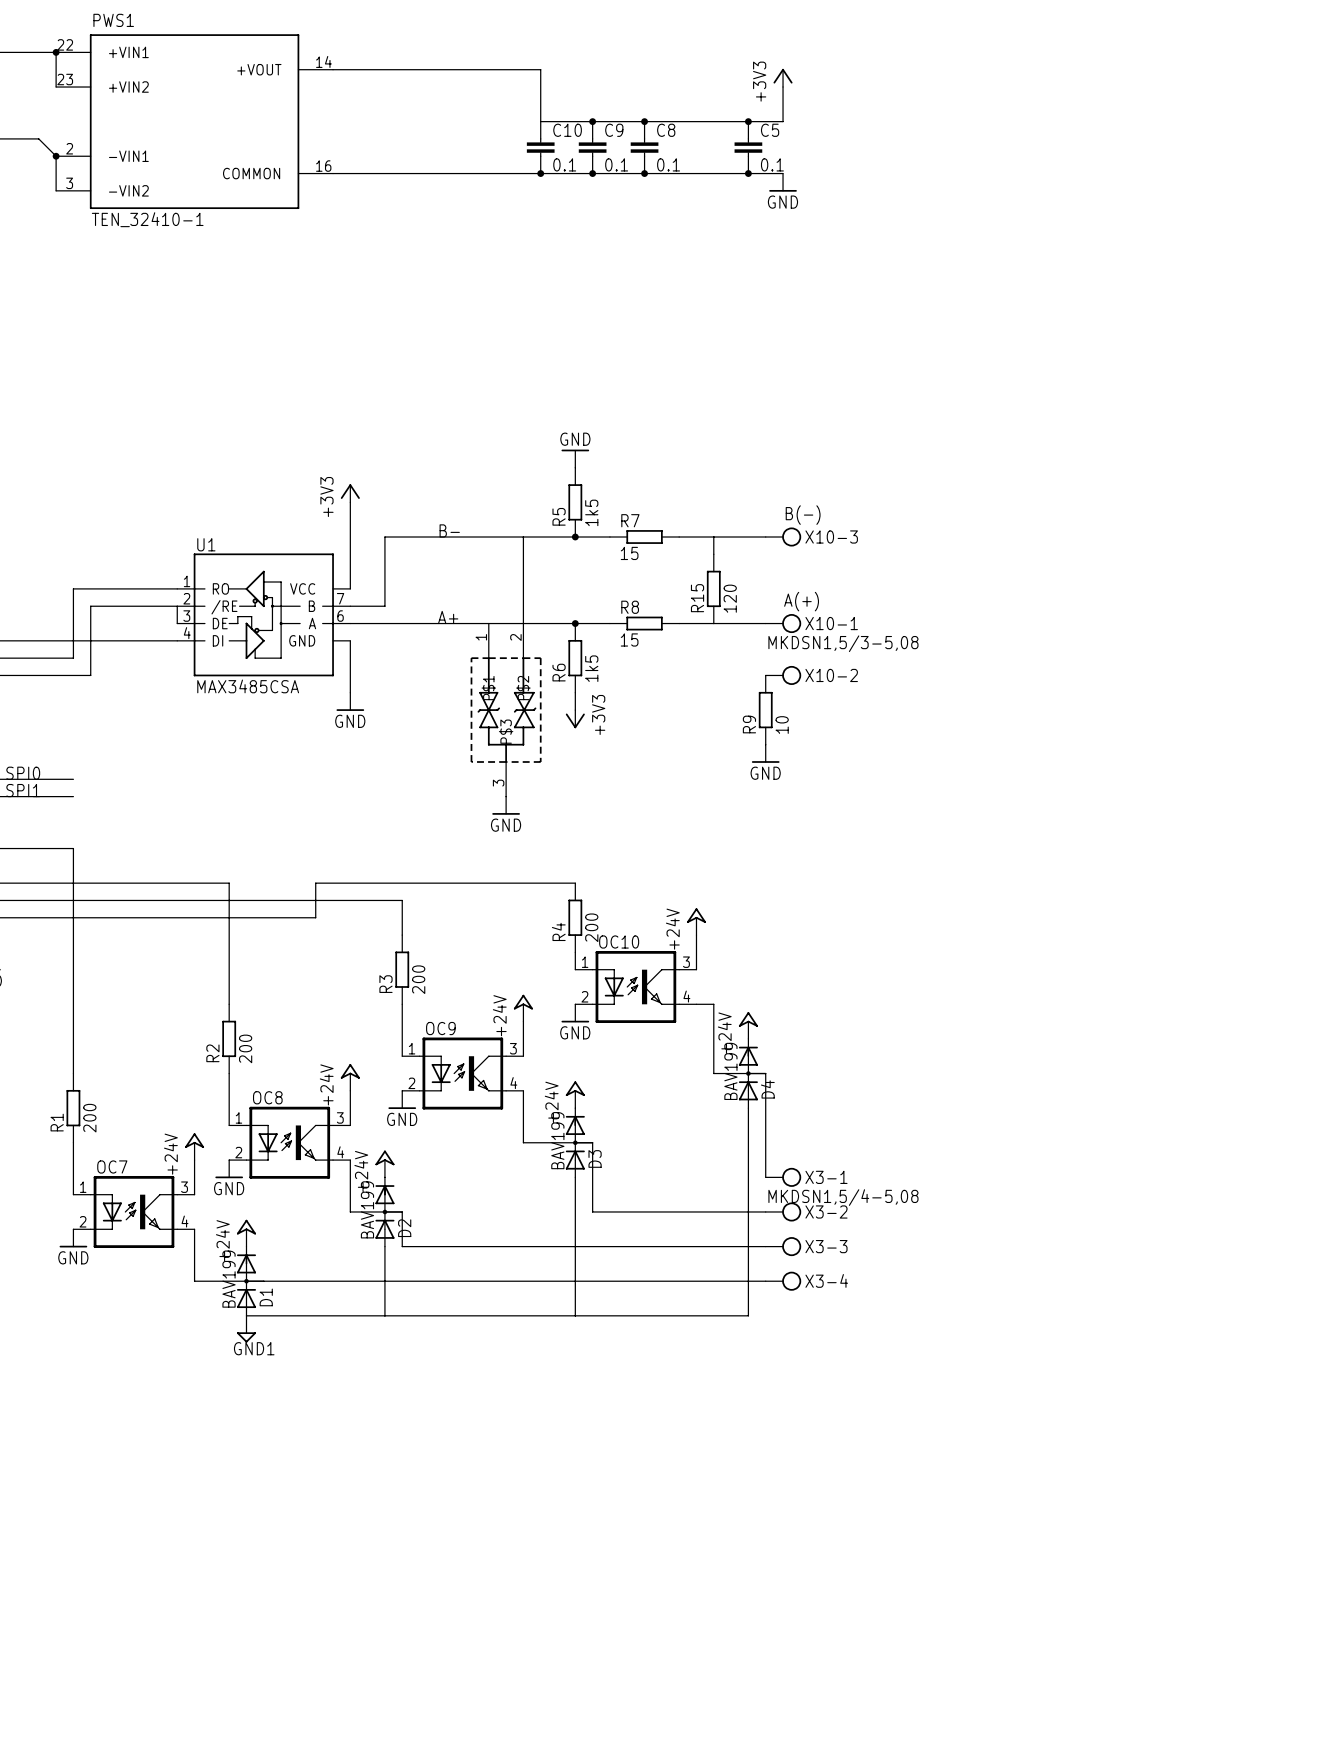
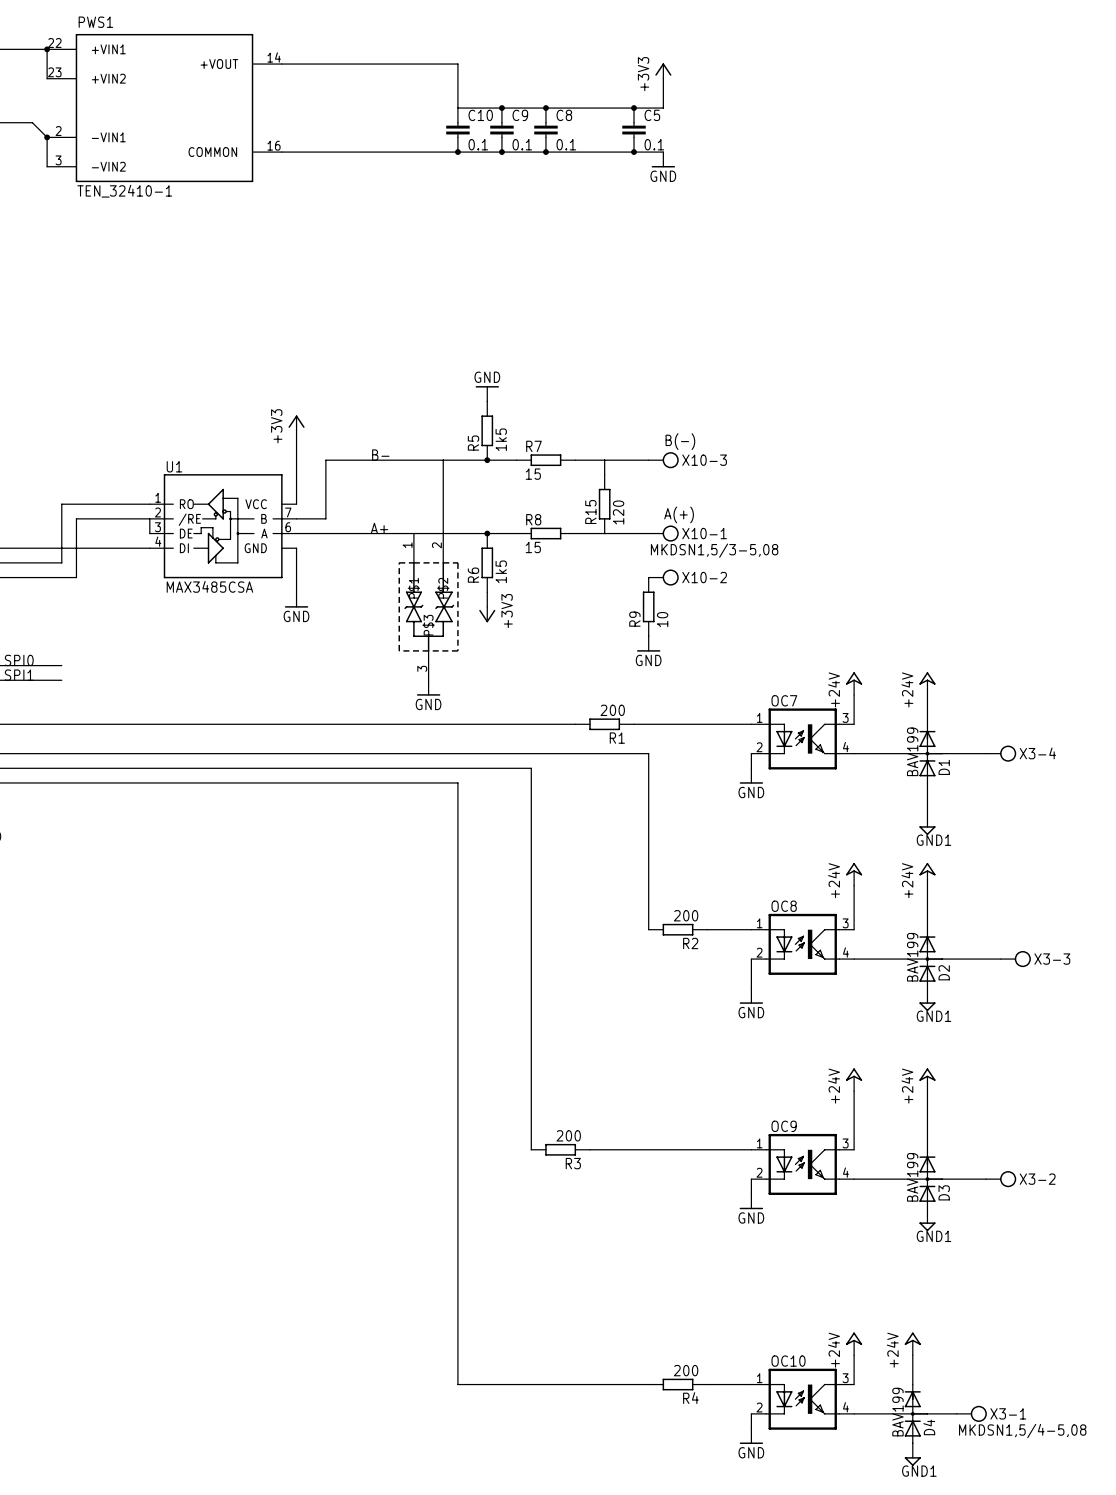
power symbol: none -> +24V (854, 683)
power symbol: none -> +24V (927, 683)
wire: none -> (854, 694) (854, 724)
wire: none -> (927, 694) (927, 724)
wire: (73, 848) (73, 1073) -> (61, 724) (575, 724)
wire: none -> (634, 724) (751, 724)
wire: (229, 883) (229, 1004) -> none
wire: (315, 883) (315, 917) -> (267, 753) (193, 753)
wire: none -> (751, 753) (751, 768)
wire: none -> (854, 753) (986, 753)
wire: (402, 900) (402, 935) -> (340, 768) (531, 768) (531, 1149)
power symbol: none -> GND (751, 776)
wire: none -> (267, 782) (457, 782) (457, 1384) (648, 1384)
R4 rotation: 0° (575, 917) -> 90° clockwise (678, 1384)
R4 position: (575, 917) -> (678, 1384)
wire: none -> (927, 782) (927, 812)
power symbol: +24V (696, 921) -> none
R4 value position: 200 (591, 927) -> 200 (686, 1370)
R4 name position: R4 (558, 931) -> R4 (690, 1398)
wire: (696, 935) (696, 969) -> none
wire: (575, 952) (575, 969) -> none
power symbol: none -> GND1 (927, 823)
R3 rotation: 0° (402, 969) -> 90° clockwise (560, 1149)
R3 position: (402, 969) -> (560, 1149)
R3 value position: 200 (418, 979) -> 200 (568, 1135)
R3 name position: R3 (385, 984) -> R3 (573, 1163)
OC10 position: (635, 986) -> (802, 1399)
wire: (402, 1004) (402, 1056) -> none
wire: (696, 1004) (713, 1004) (713, 1073) (765, 1073) -> (487, 753) (648, 753) (648, 915)
power symbol: +24V (523, 1008) -> none
power symbol: GND (575, 1013) -> none
wire: (523, 1021) (523, 1056) -> none
power symbol: +24V (748, 1025) -> none
power symbol: none -> +24V (854, 874)
power symbol: none -> +24V (927, 874)
R2 rotation: 0° (229, 1038) -> 90° clockwise (678, 929)
R2 position: (229, 1038) -> (678, 929)
wire: none -> (854, 885) (854, 929)
wire: none -> (927, 885) (927, 929)
R2 value position: 200 (245, 1048) -> 200 (686, 915)
R2 name position: R2 (212, 1053) -> R2 (690, 943)
wire: (229, 1073) (229, 1125) -> none
OC9 position: (462, 1073) -> (802, 1164)
D4 position: (752, 1073) -> (916, 1413)
power symbol: +24V (350, 1077) -> none
wire: (350, 1090) (350, 1125) -> none
wire: (523, 1090) (523, 1142) (592, 1142) (592, 1211) (765, 1211) -> none
wire: (765, 1090) (765, 1177) -> none
wire: none -> (707, 929) (751, 929)
power symbol: +24V (575, 1094) -> none
power symbol: GND (402, 1099) -> none
R1 rotation: 0° (73, 1108) -> 90° clockwise (604, 724)
R1 position: (73, 1108) -> (604, 724)
wire: (748, 1108) (748, 1315) (246, 1315) -> none
R1 value position: 200 (89, 1118) -> 200 (612, 710)
R1 name position: R1 (57, 1122) -> R1 (617, 738)
wire: none -> (751, 959) (751, 988)
wire: none -> (854, 959) (1000, 959)
wire: (73, 1142) (73, 1194) -> none
OC8 position: (289, 1142) -> (802, 944)
D3 position: (579, 1142) -> (930, 1179)
power symbol: +24V (194, 1146) -> none
wire: (194, 1160) (194, 1194) -> none
wire: (350, 1160) (350, 1211) (402, 1211) (402, 1246) (765, 1246) -> none
power symbol: +24V (384, 1163) -> none
power symbol: GND (229, 1169) -> none
power symbol: none -> GND (751, 996)
power symbol: none -> GND1 (927, 999)
wire: (575, 1177) (575, 1315) -> none
X3-1 position: (783, 1177) -> (971, 1413)
OC7 position: (133, 1211) -> (802, 738)
D2 position: (388, 1211) -> (930, 959)
X3-2 position: (783, 1211) -> (1001, 1179)
wire: (194, 1229) (194, 1281) (765, 1281) -> none
power symbol: +24V (246, 1233) -> none
power symbol: GND (73, 1238) -> none
wire: (384, 1246) (384, 1315) -> none
X3-3 position: (783, 1246) -> (1015, 959)
power symbol: none -> +24V (854, 1079)
power symbol: none -> +24V (927, 1079)
D1 position: (250, 1281) -> (930, 753)
X3-4 position: (783, 1281) -> (1001, 753)
wire: none -> (854, 1091) (854, 1149)
wire: none -> (927, 1091) (927, 1149)
power symbol: GND1 (246, 1329) -> none
wire: none -> (589, 1149) (751, 1149)
wire: none -> (751, 1179) (751, 1193)
wire: none -> (854, 1179) (986, 1179)
power symbol: none -> GND (751, 1201)
power symbol: none -> GND1 (927, 1219)
power symbol: none -> +24V (854, 1343)
power symbol: none -> +24V (912, 1343)
wire: none -> (854, 1355) (854, 1384)
wire: none -> (912, 1355) (912, 1384)
wire: none -> (707, 1384) (751, 1384)
wire: none -> (751, 1413) (751, 1428)
wire: none -> (854, 1413) (956, 1413)
power symbol: none -> GND (751, 1436)
power symbol: none -> GND1 (912, 1454)

